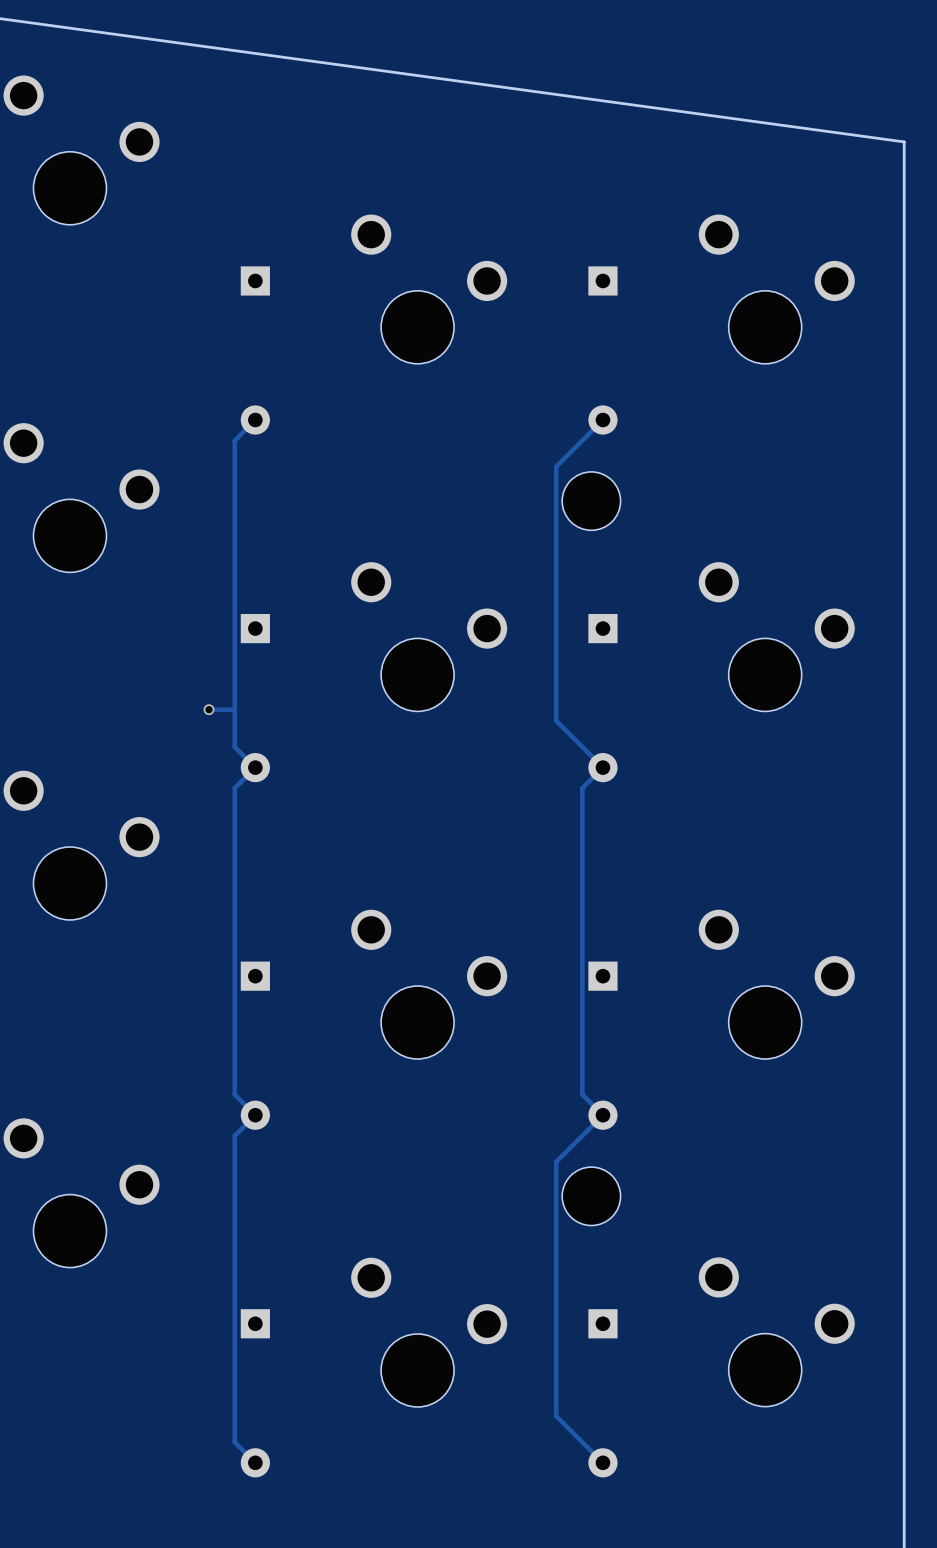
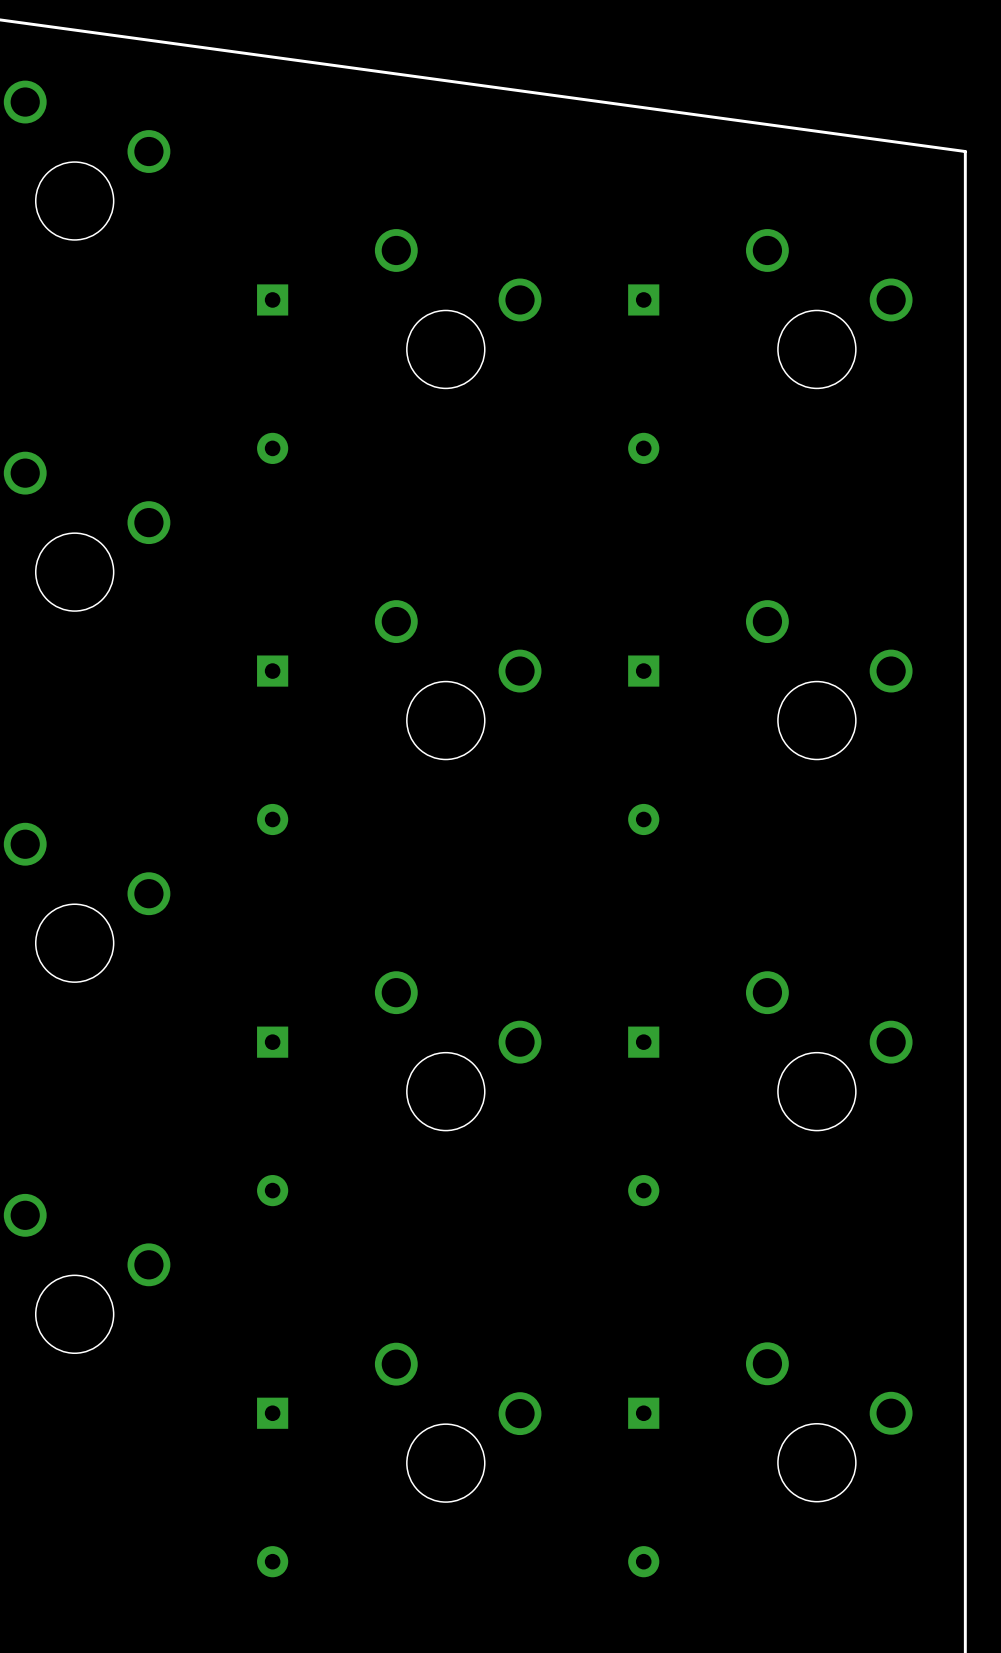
track: (255, 420) (234, 440) (234, 747) (255, 767) (234, 788) (234, 1094) (255, 1115) (234, 1135) (234, 1442) (255, 1462) -> none
track: (602, 420) (556, 466) (556, 720) (602, 767) (582, 788) (582, 1094) (602, 1115) (556, 1161) (556, 1416) (602, 1462) -> none
part: (591, 501) -> none
via: (209, 709) -> none
track: (234, 709) (209, 709) -> none
part: (591, 1196) -> none

